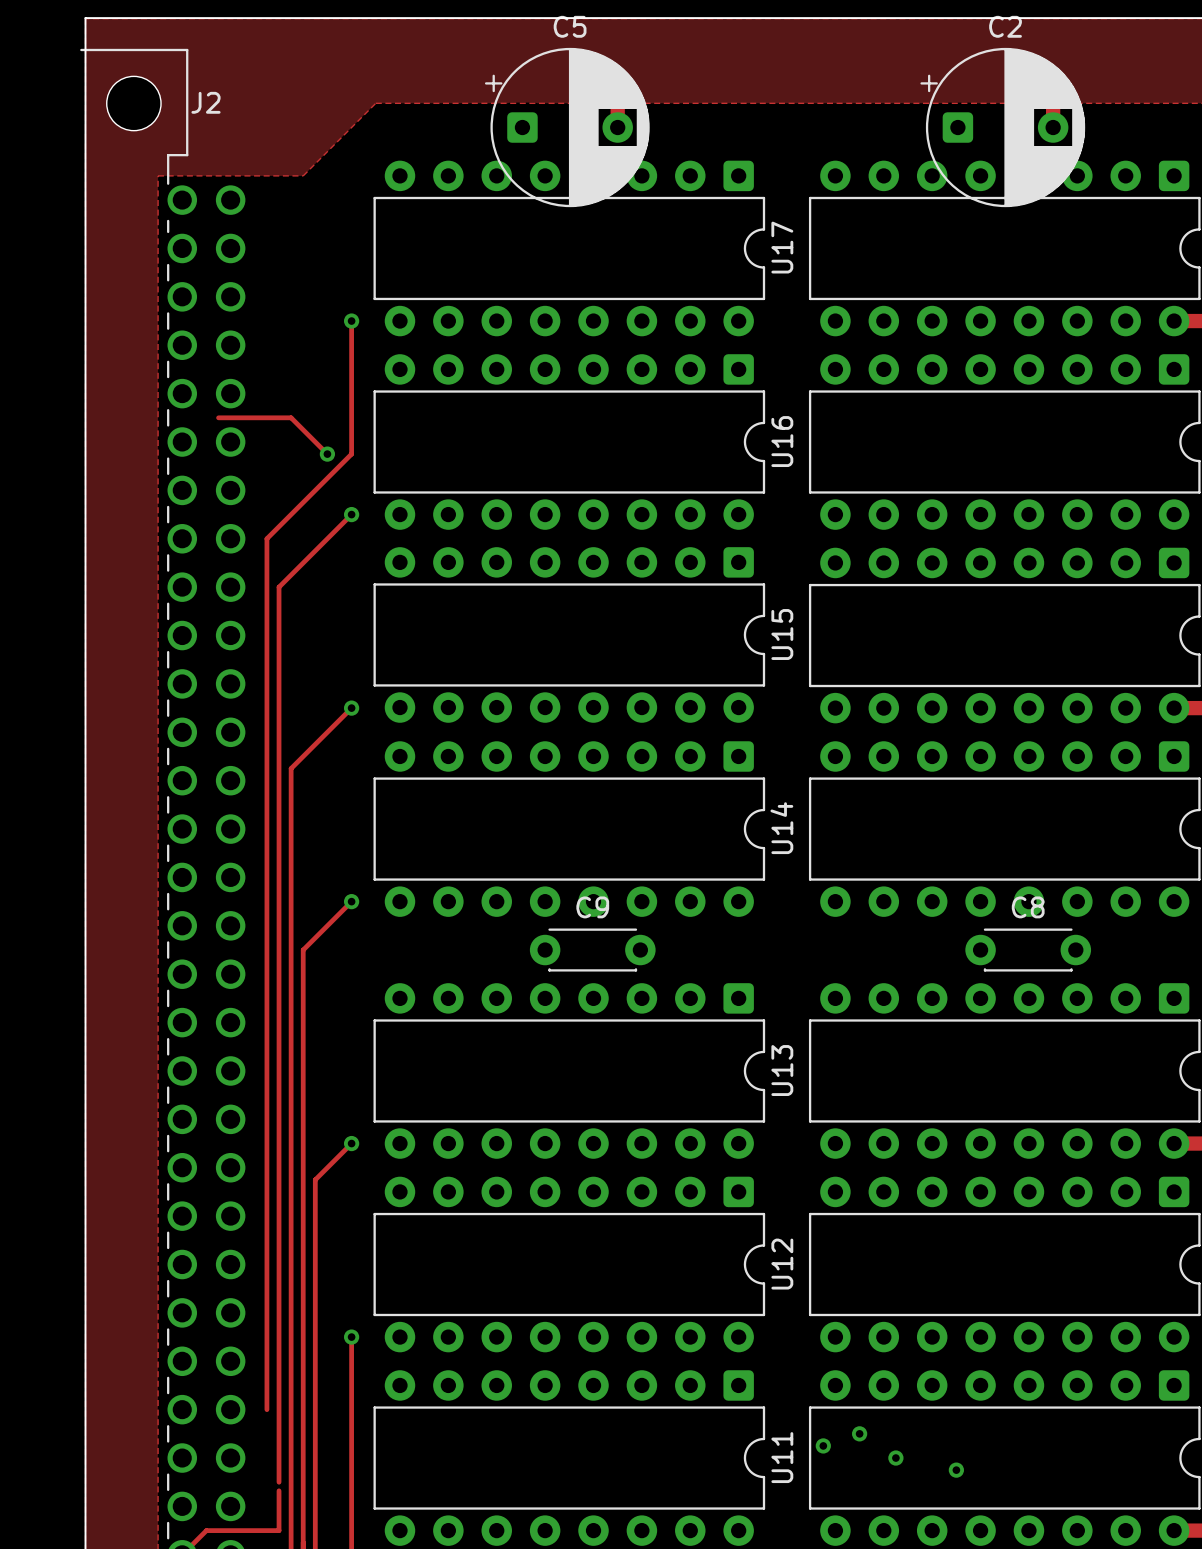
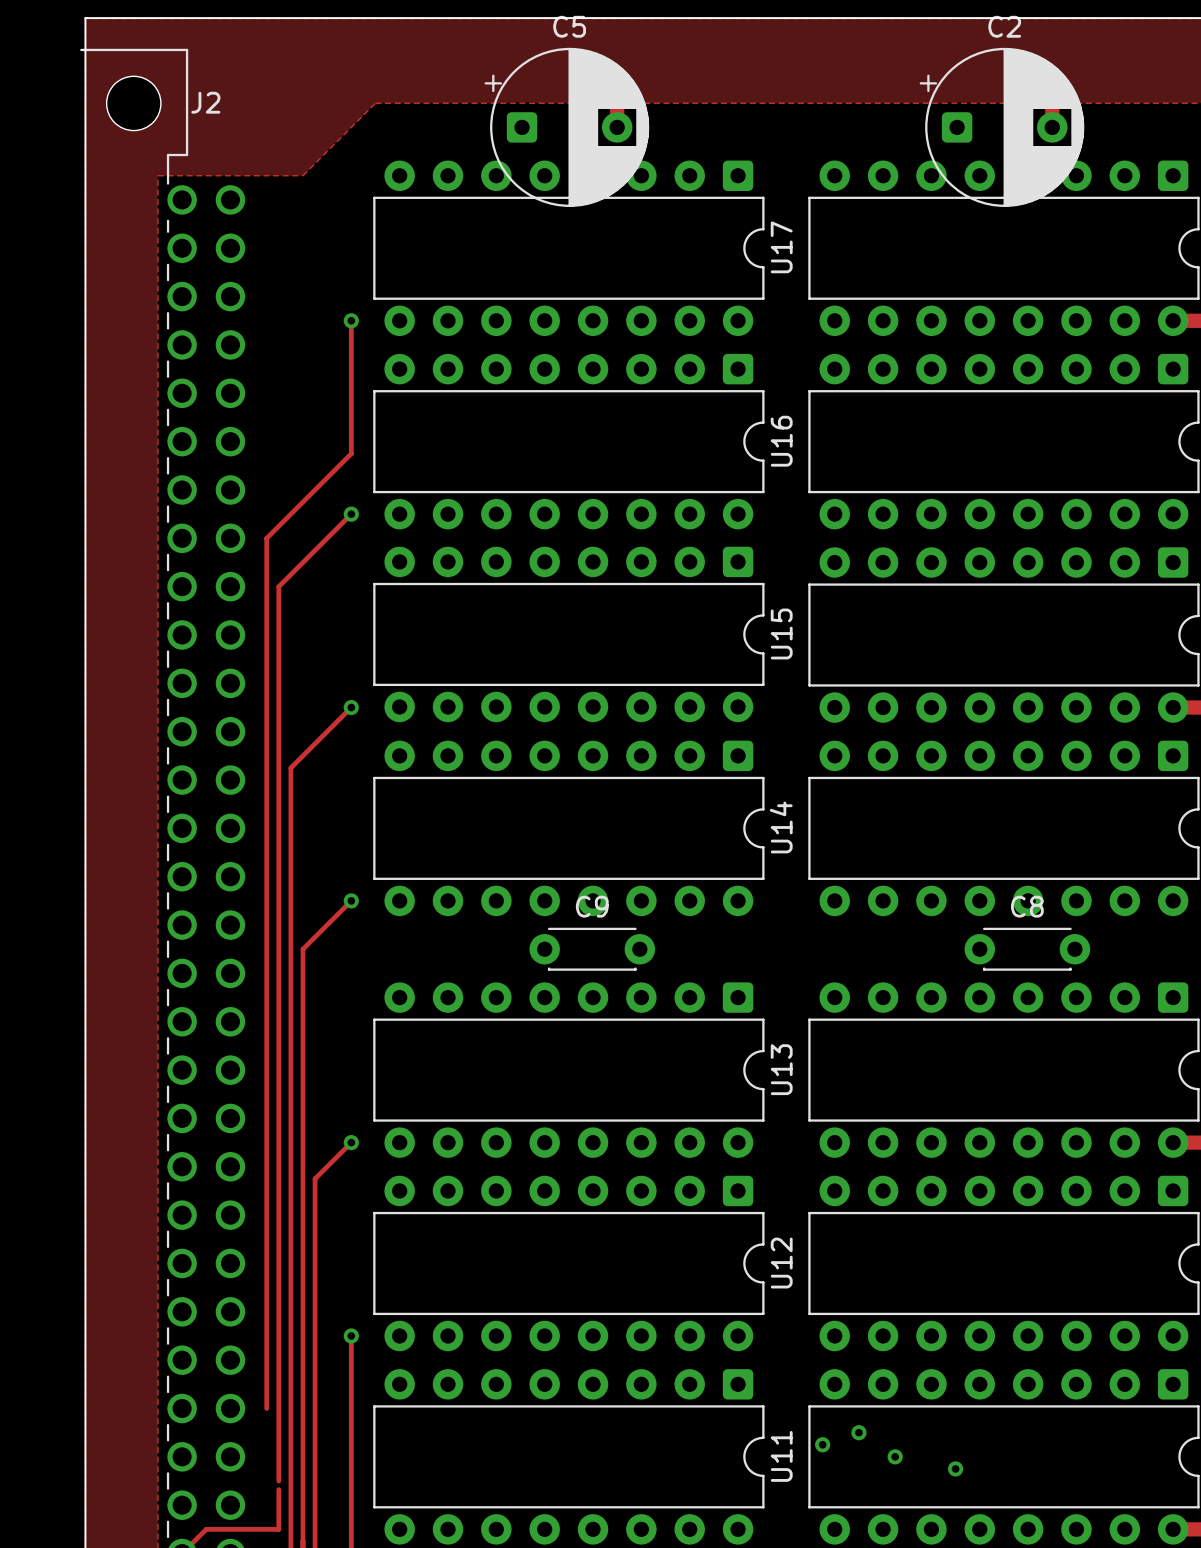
track: (218, 417) (291, 417) (327, 454) -> none
via: (327, 454) -> none

